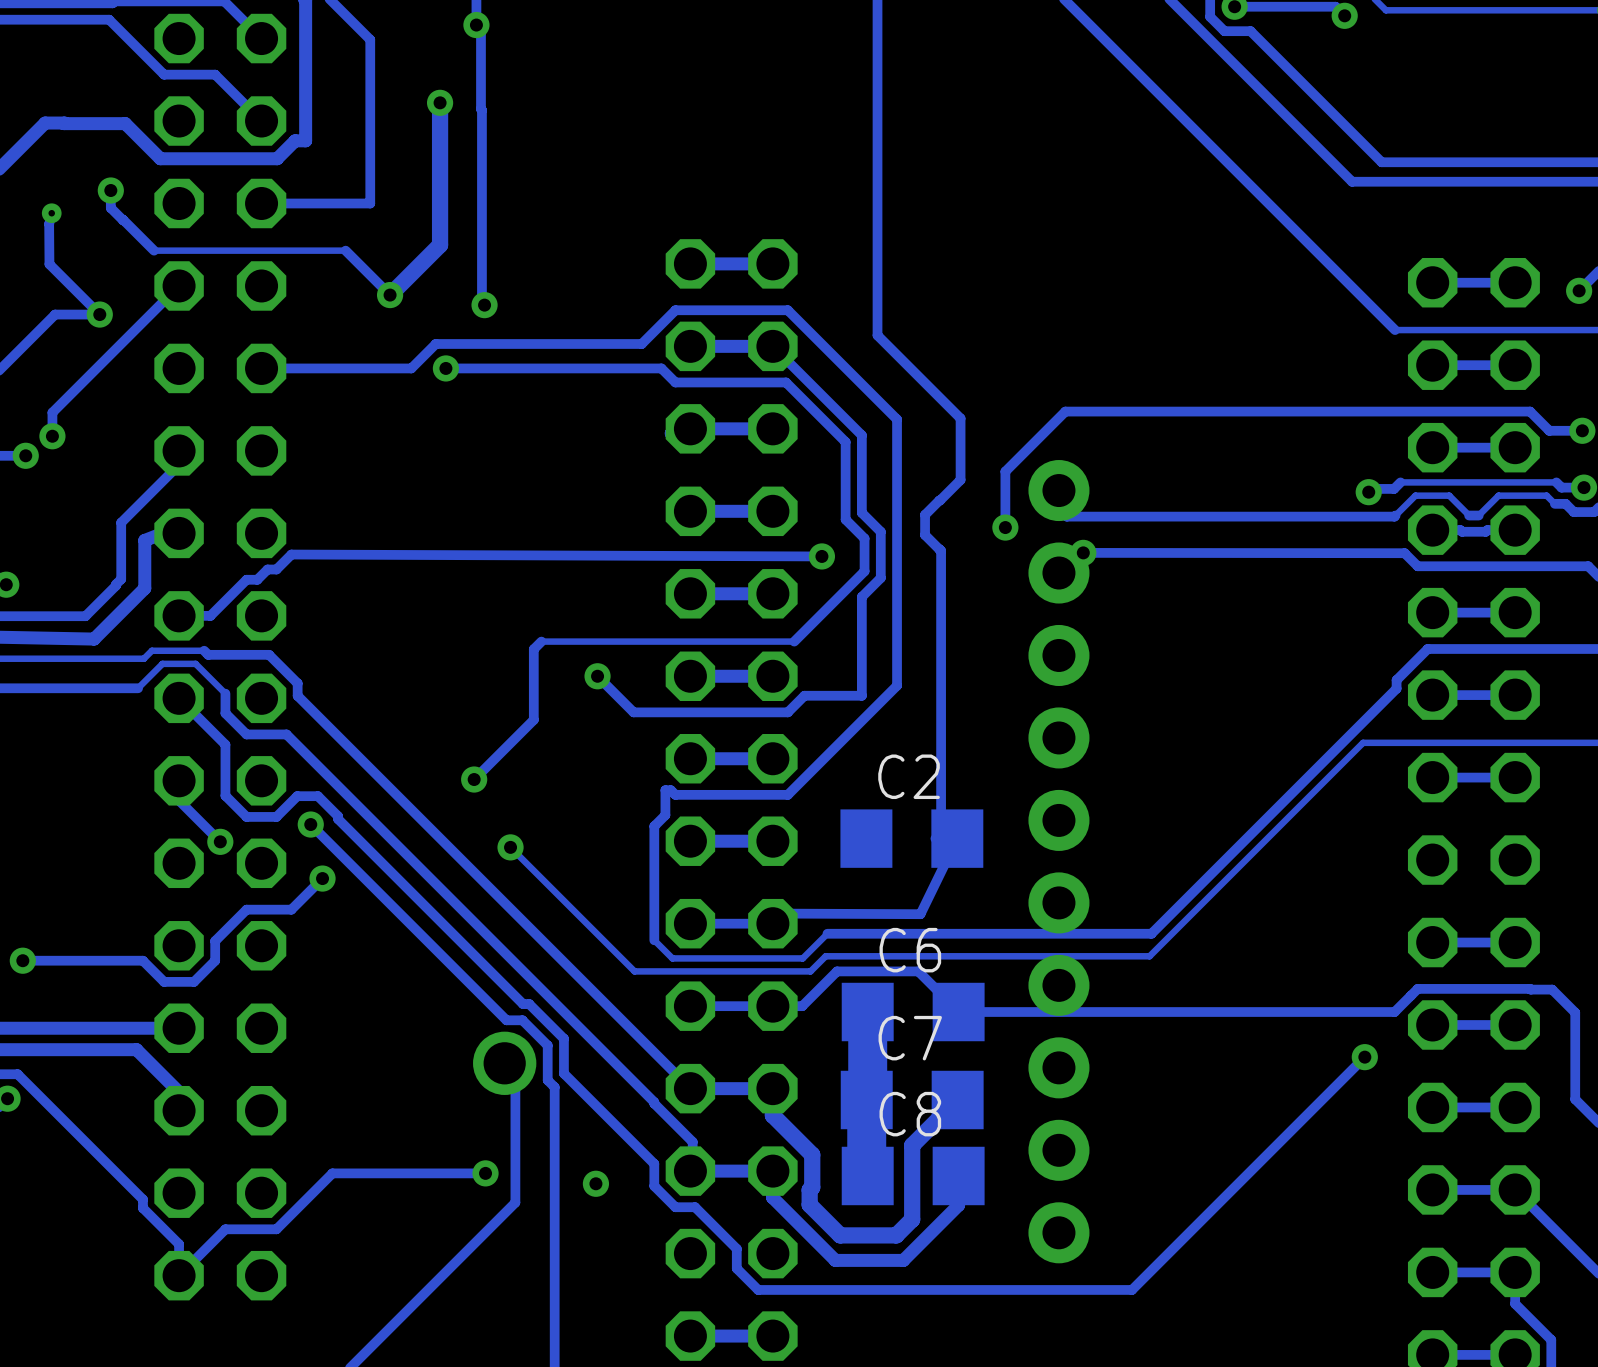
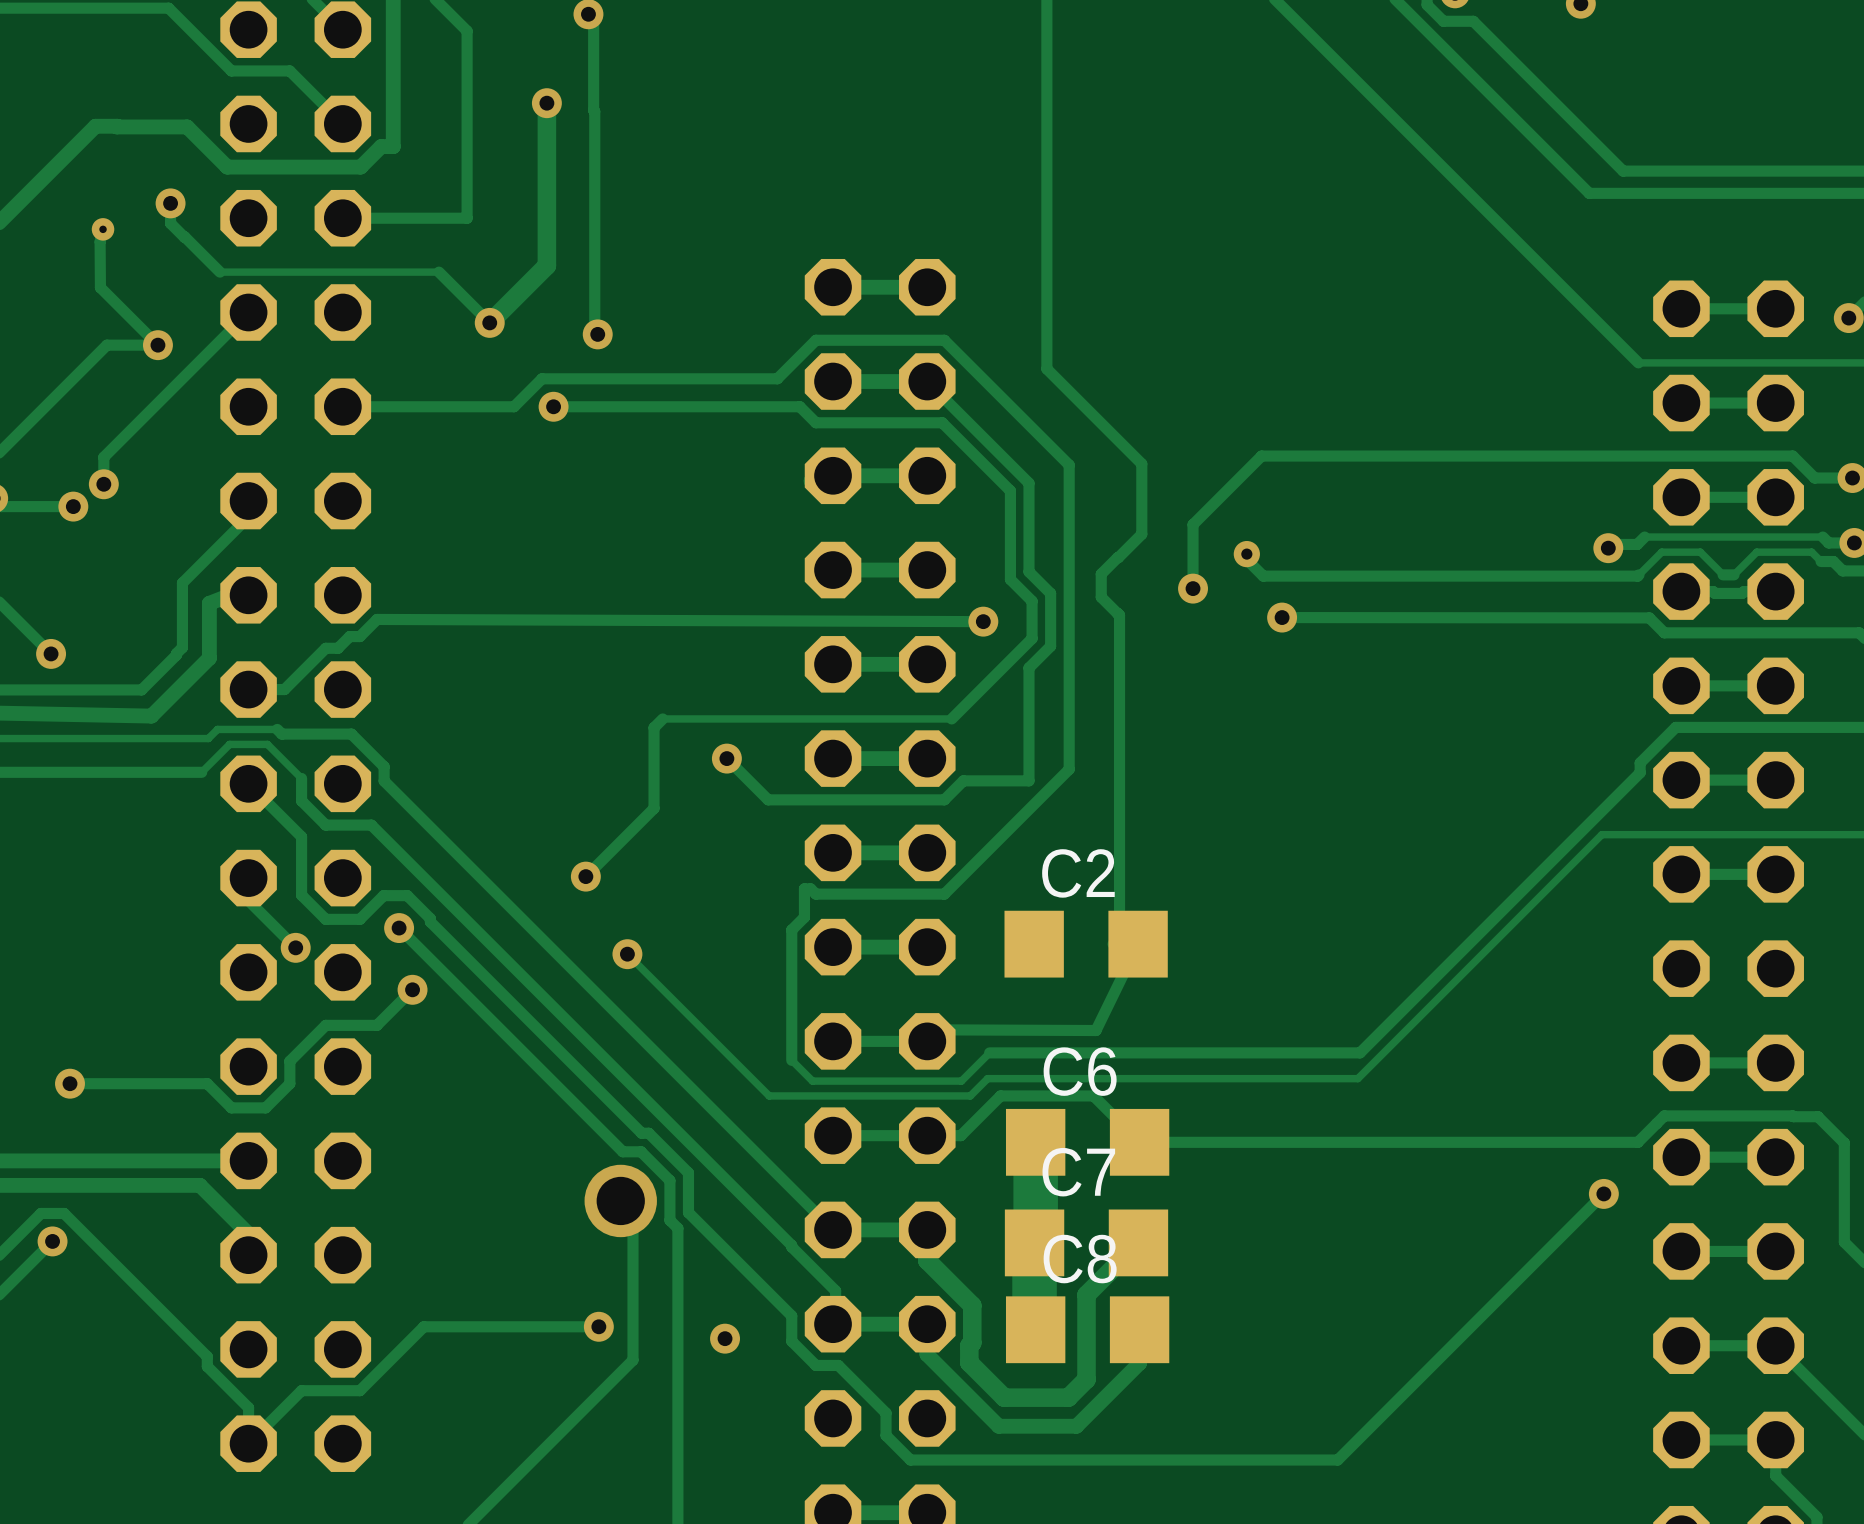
part: (1058, 861) -> none

